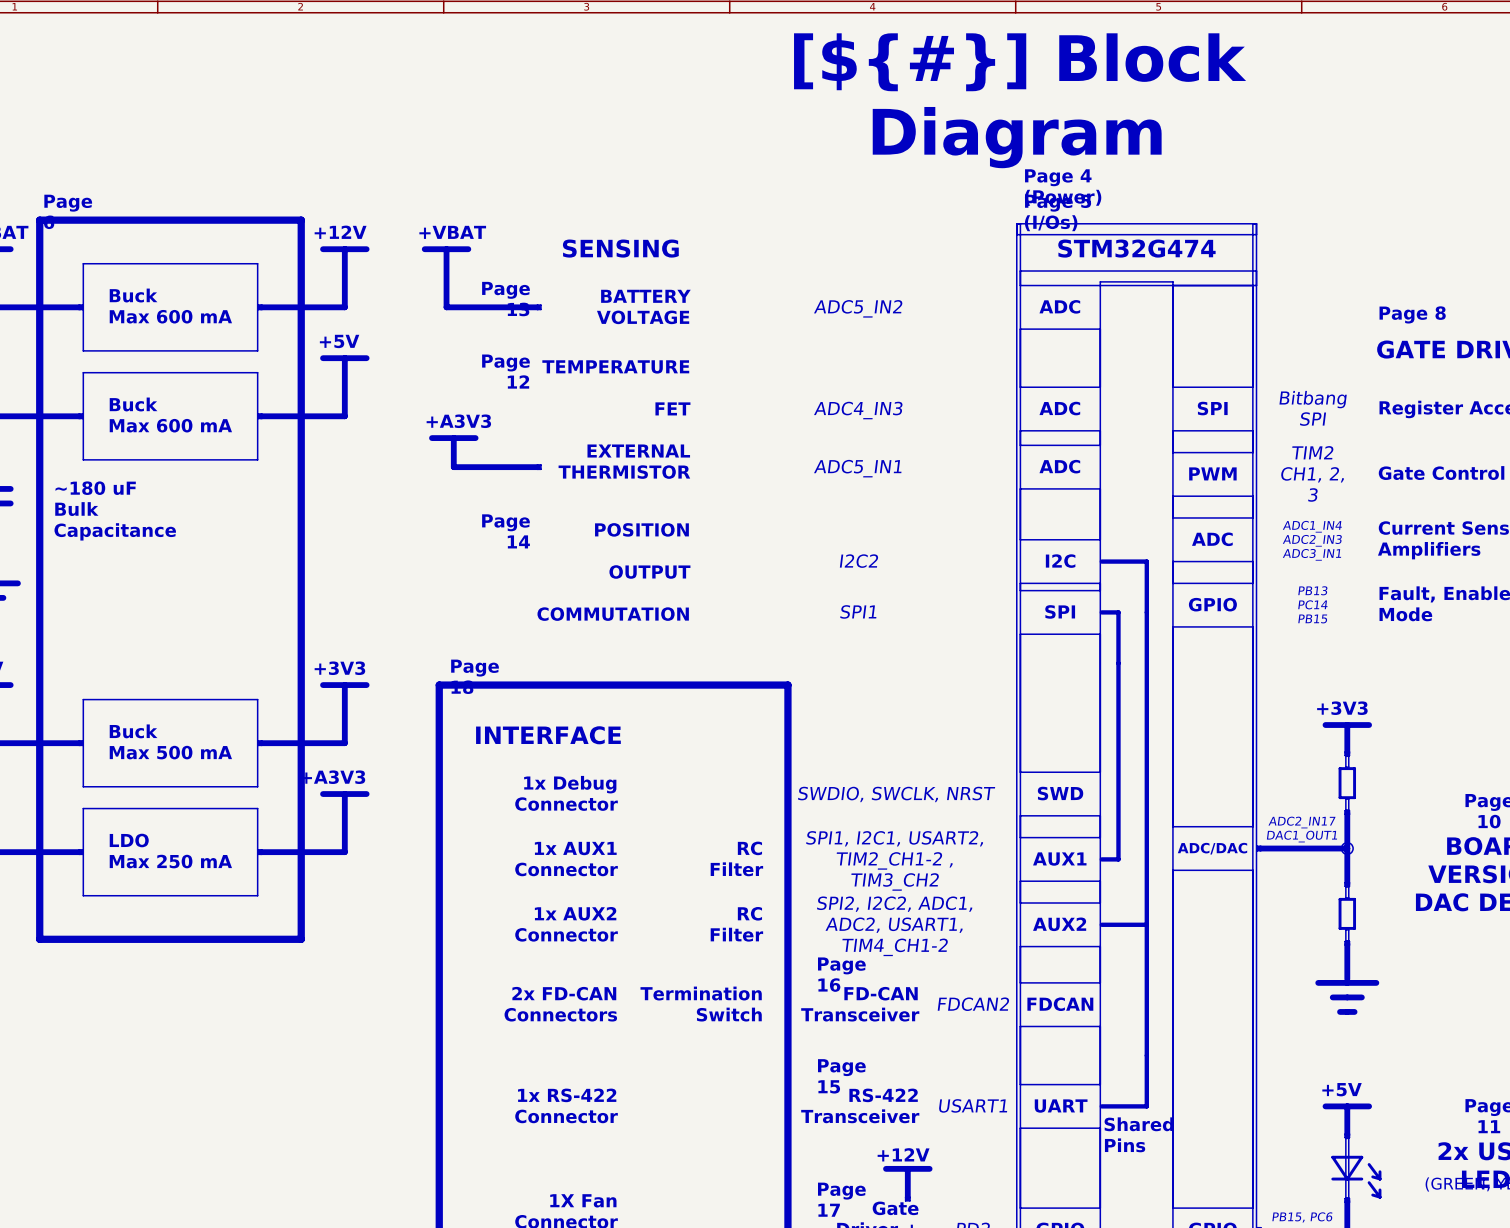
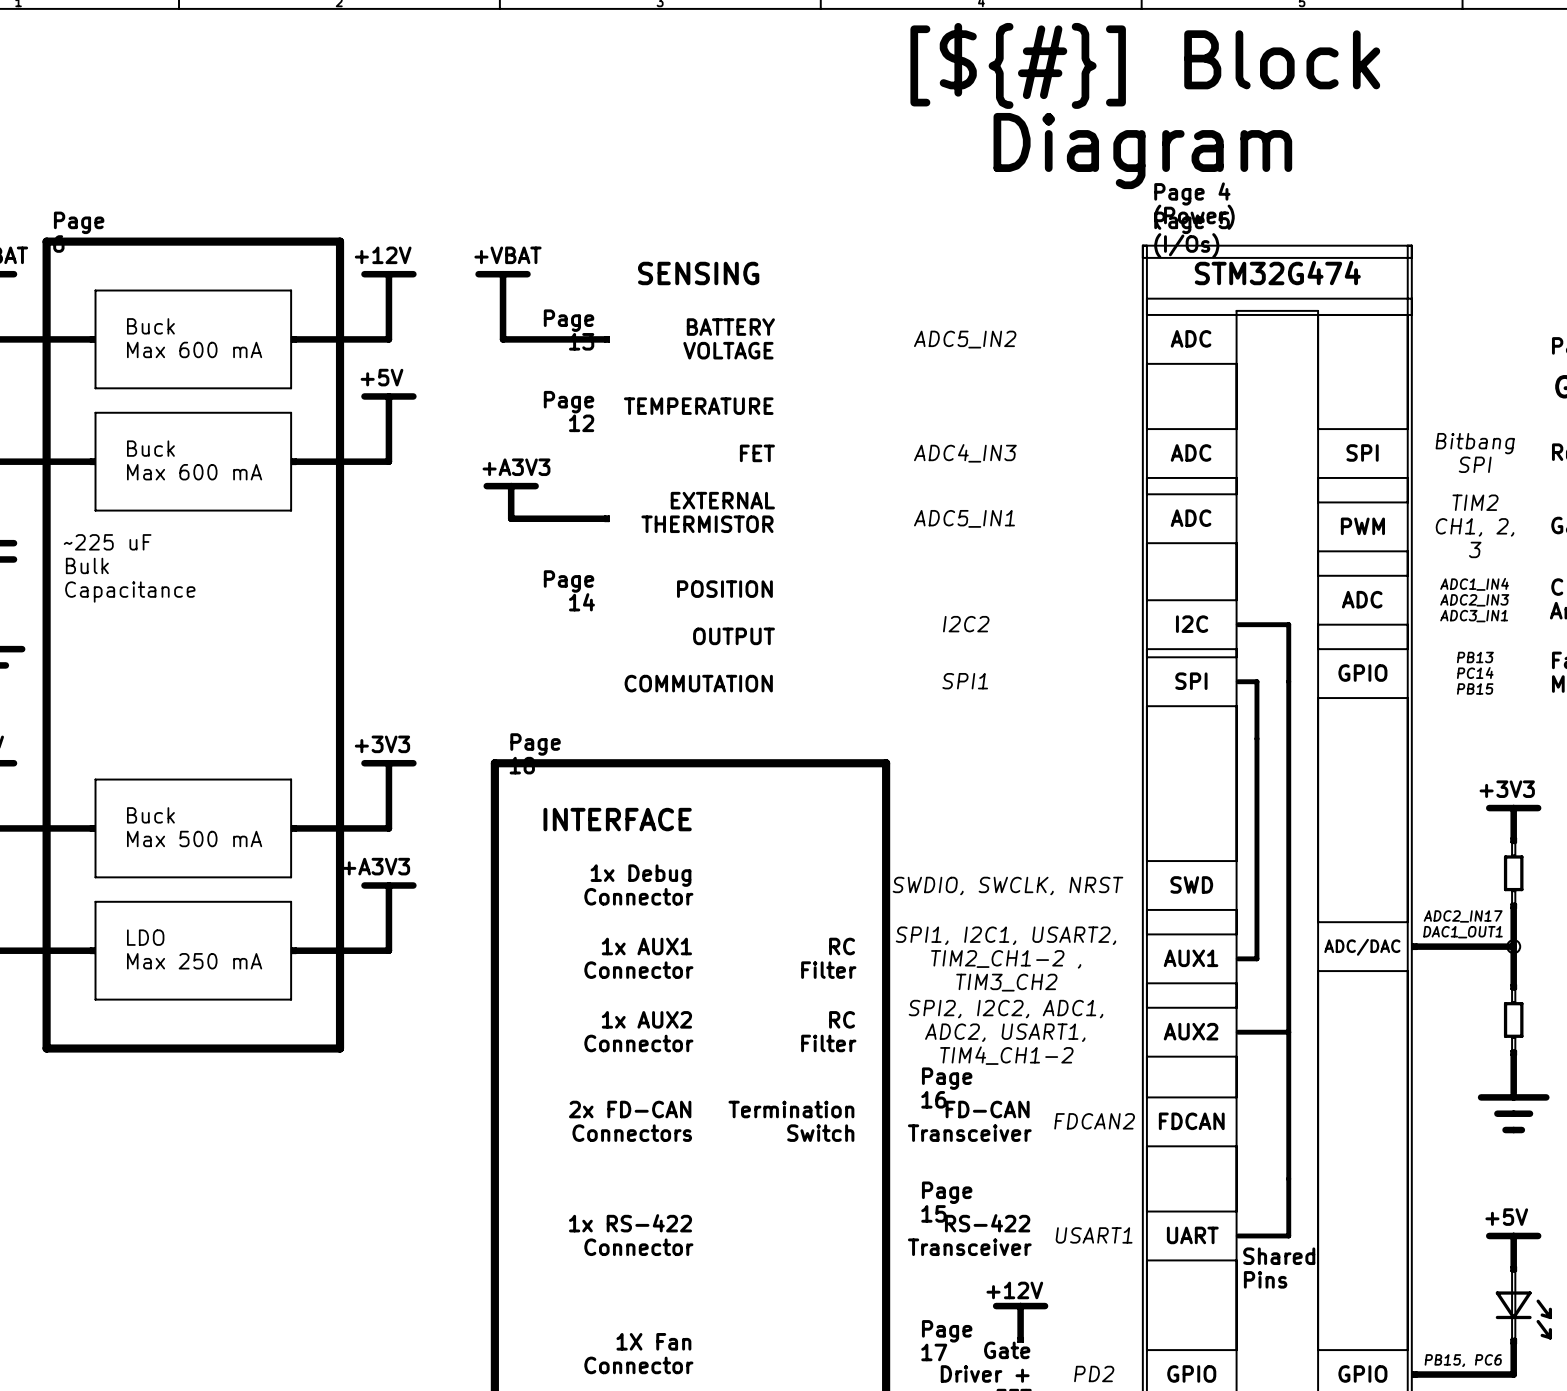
text: ~180 uF (95, 488) -> ~225 uF (107, 542)

